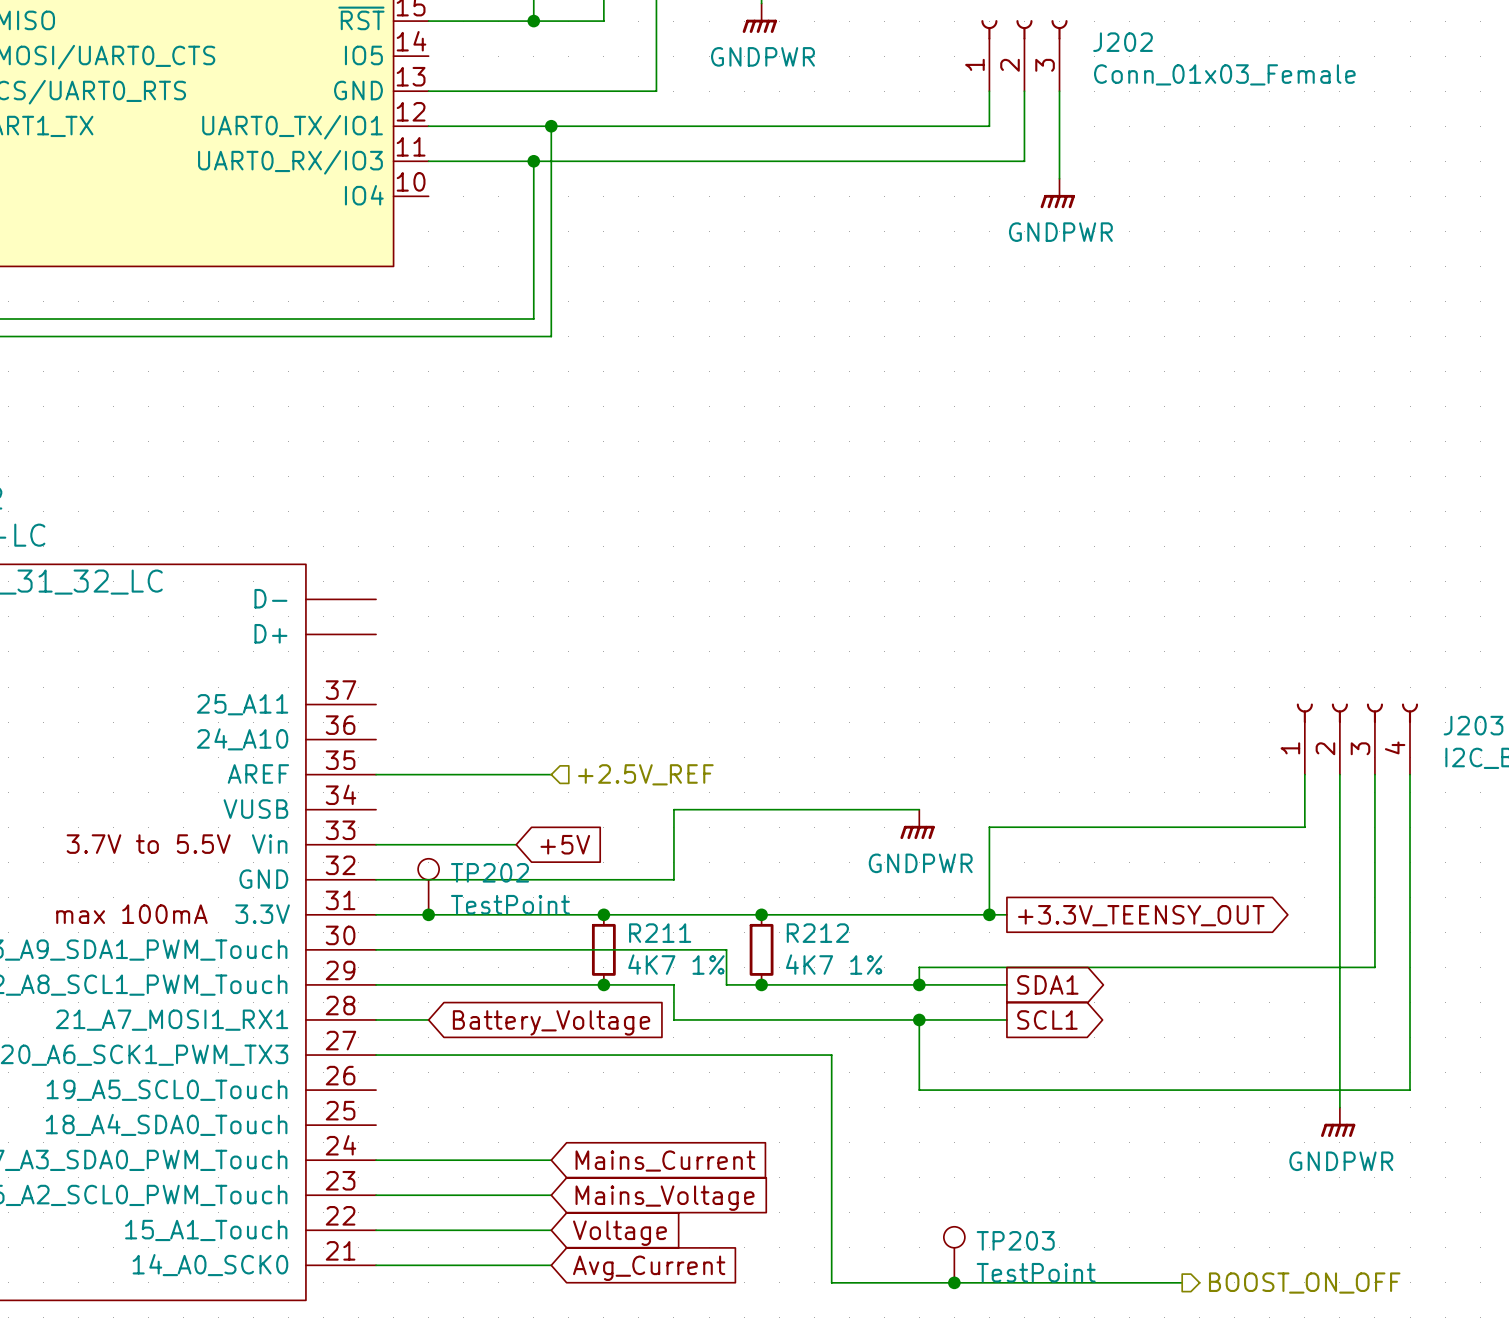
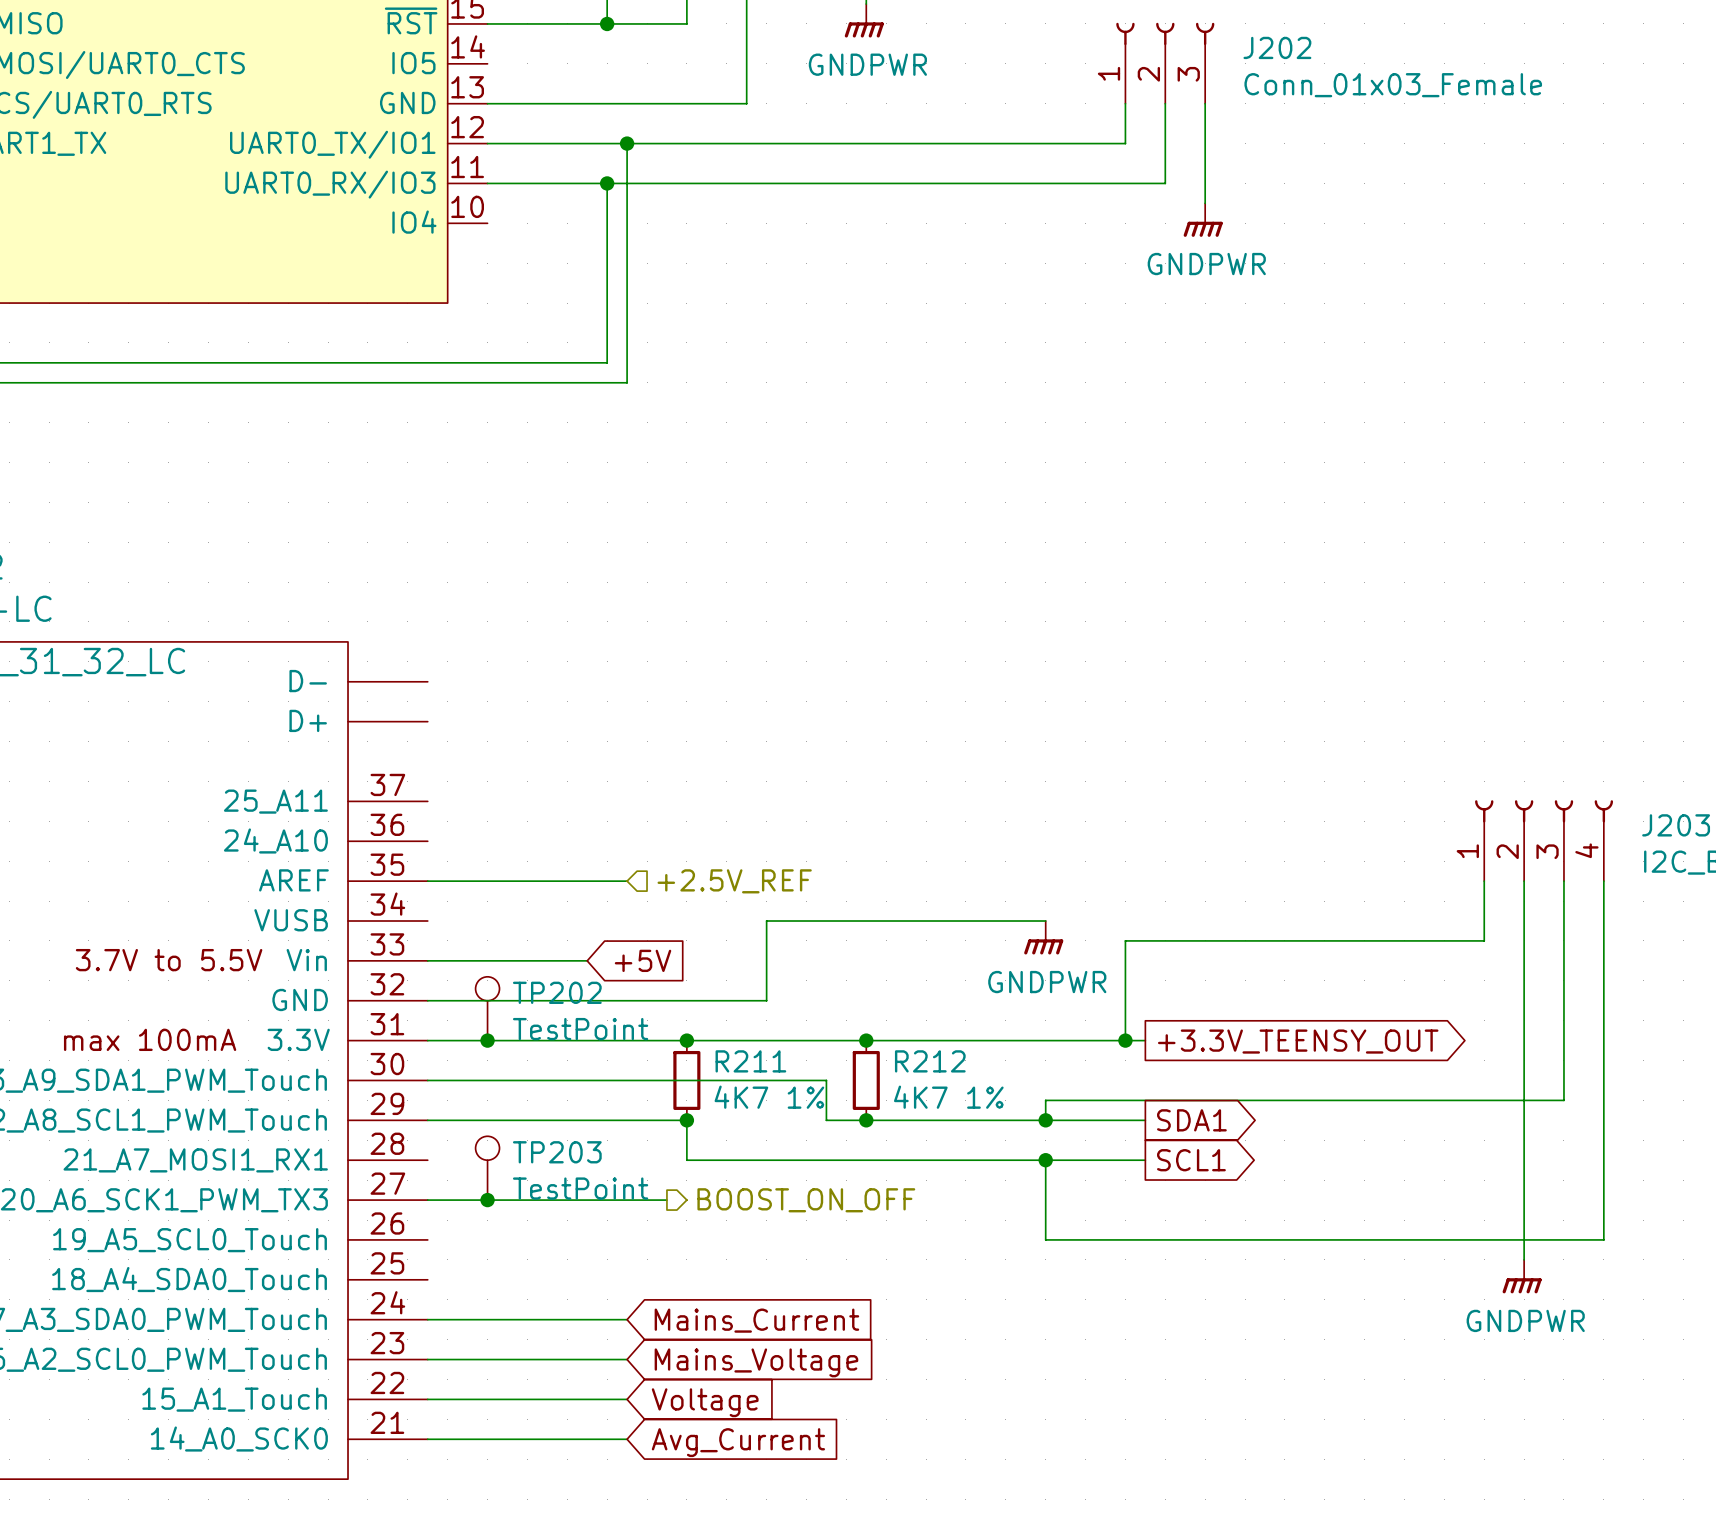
wire: (603, 984) (673, 984) (673, 1019) -> (686, 1120) (686, 1160) (766, 1160)
wire: (376, 1019) (428, 1019) -> none
global label: Battery_Voltage (551, 1022) -> none
junction: none -> (487, 1200)
wire: (586, 1055) (831, 1055) (831, 1282) (1182, 1282) -> none
hierarchical label: none -> BOOST_ON_OFF (806, 1200)
TP203 position: (954, 1254) -> (487, 1168)
junction: (954, 1282) -> none
hierarchical label: BOOST_ON_OFF (1304, 1283) -> none

